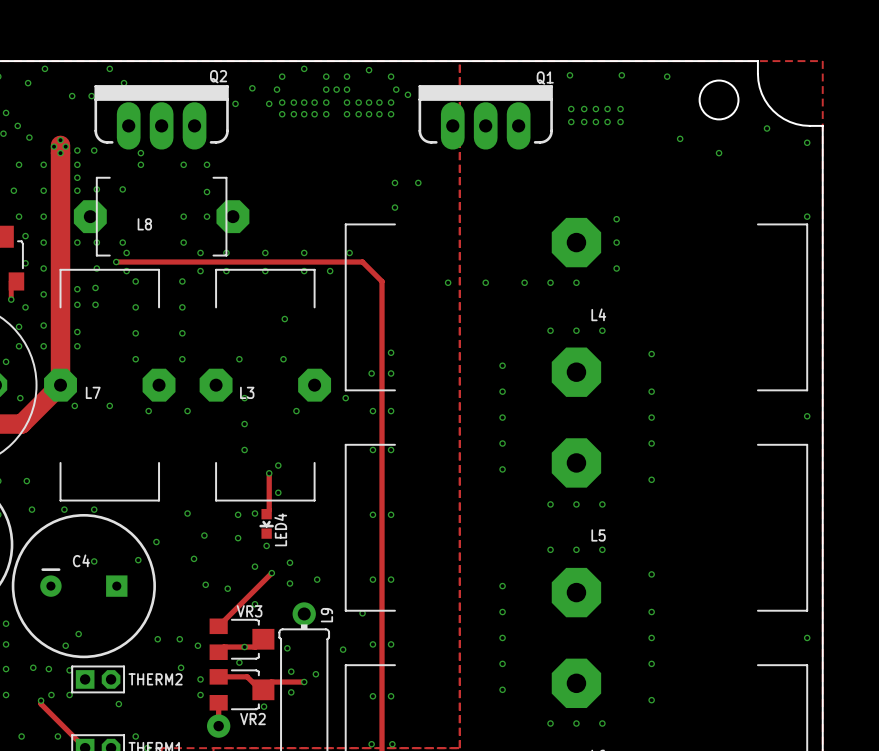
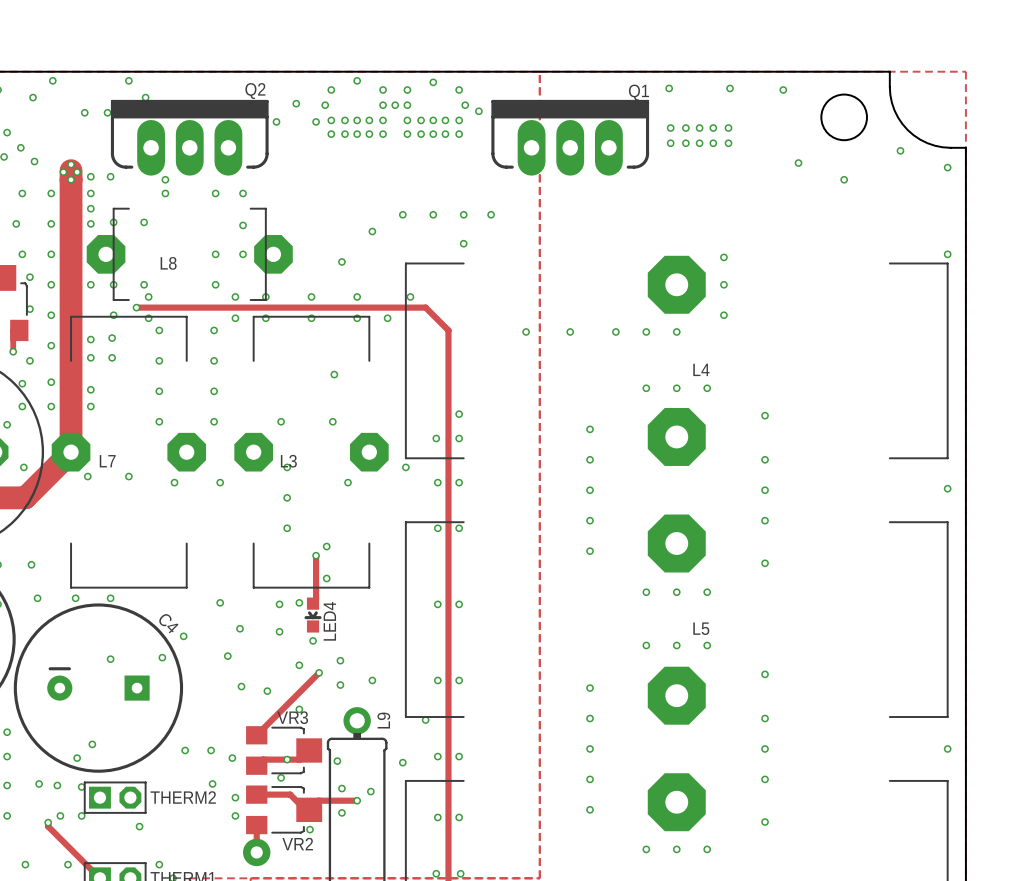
via: none -> (402, 214)
via: none -> (433, 214)
via: none -> (372, 231)
via: none -> (341, 261)
C4 name rotation: 0° (81, 560) -> 45° clockwise (168, 623)
C4 name position: C4 (81, 560) -> C4 (168, 623)

